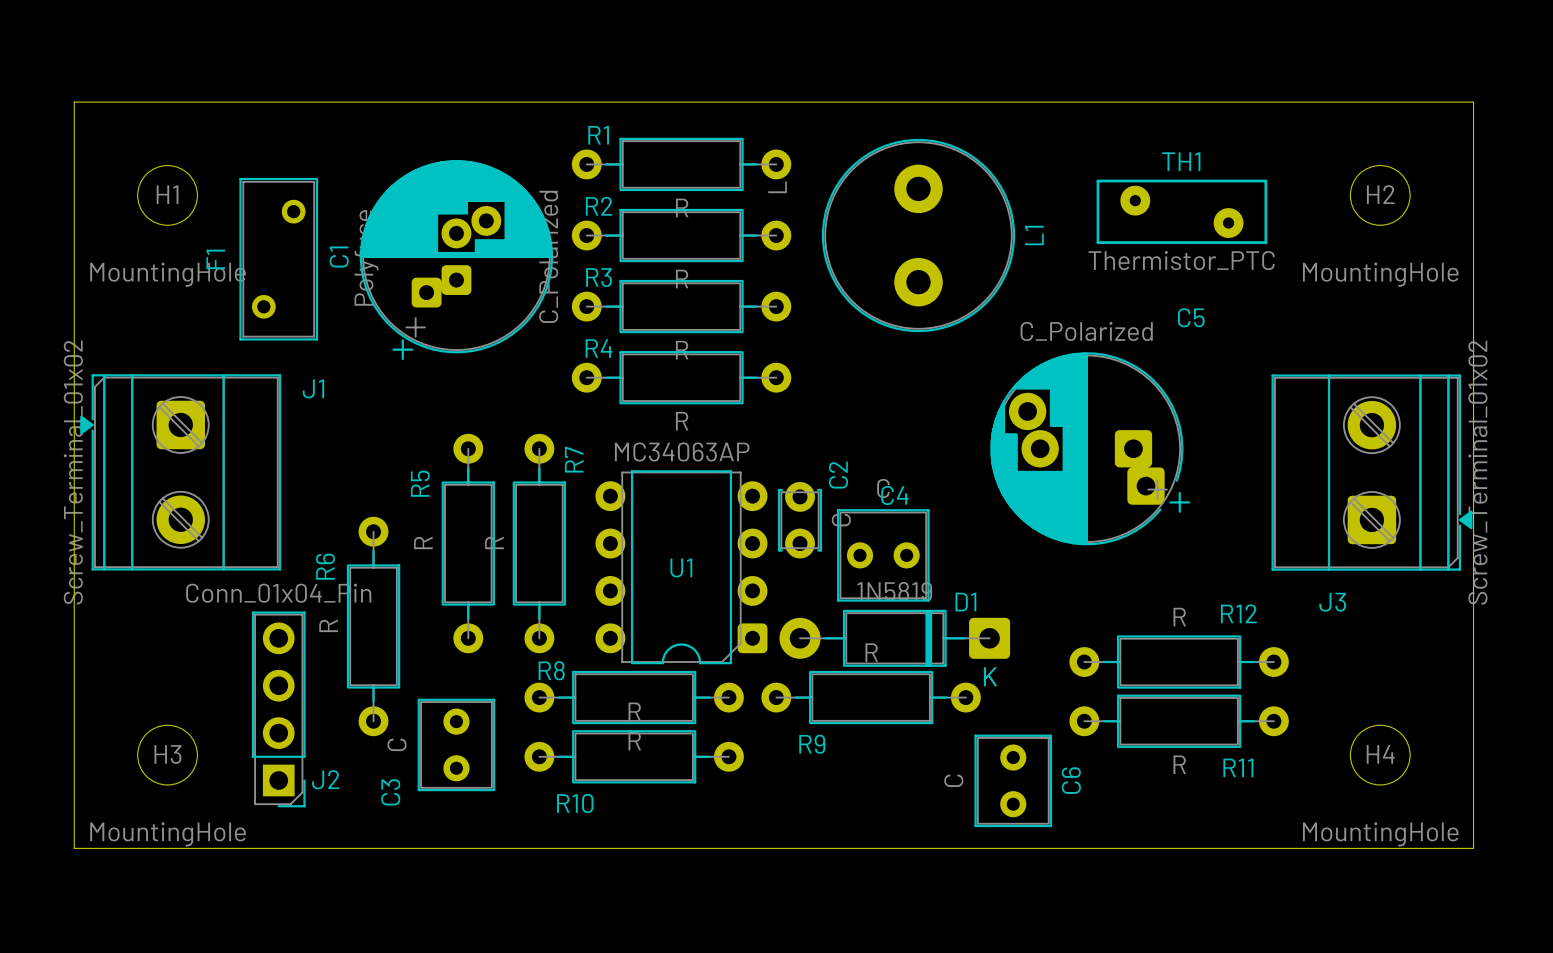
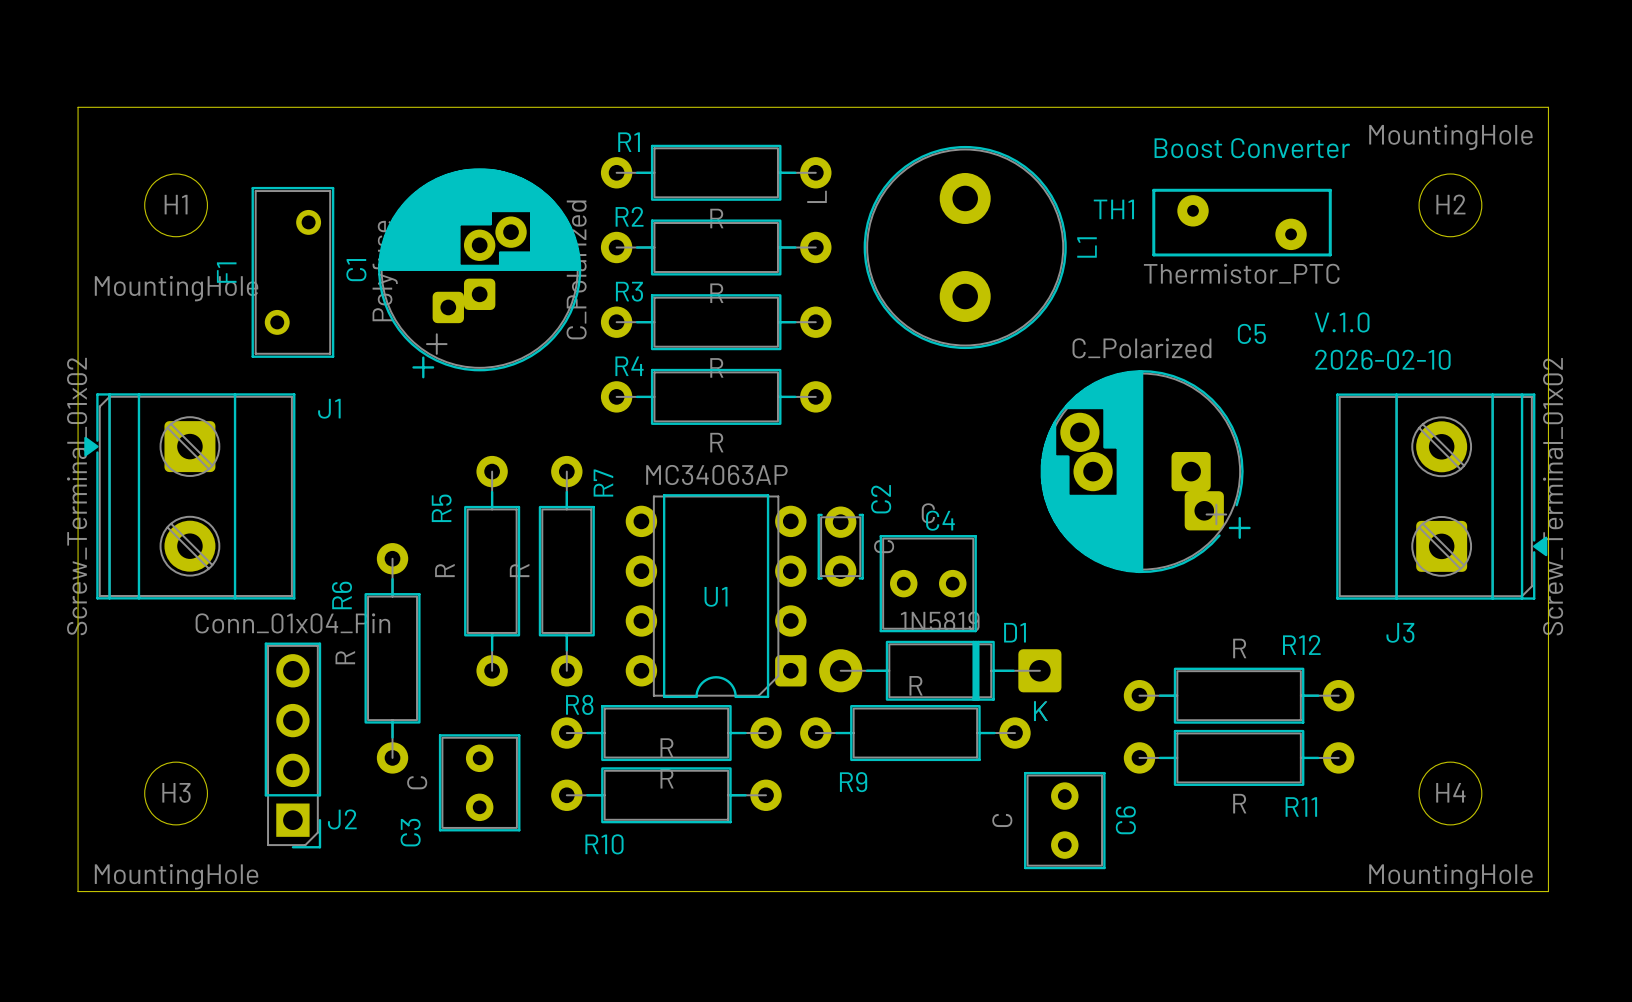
text: none -> Boost Converter (1252, 148)
TH1 name position: TH1 (1181, 161) -> TH1 (1113, 209)
H2 value position: MountingHole (1380, 274) -> MountingHole (1450, 137)
text: none -> V.1.0 (1342, 322)
text: none -> 2026-02-10 (1383, 359)

